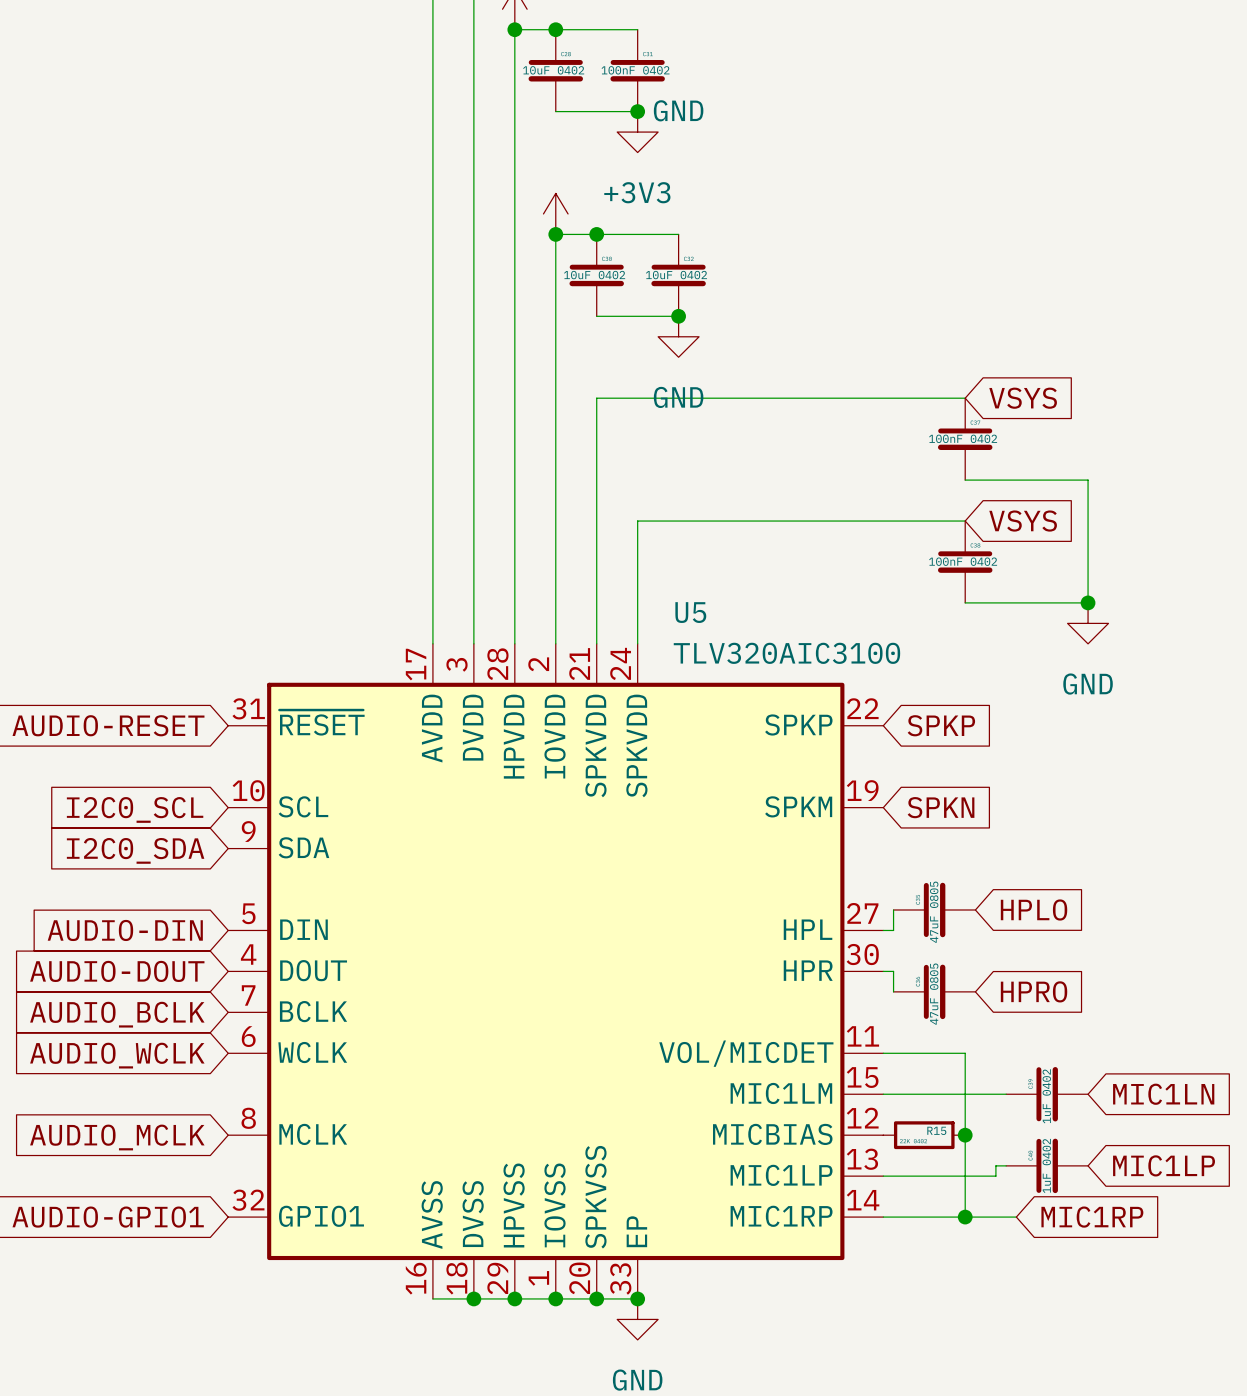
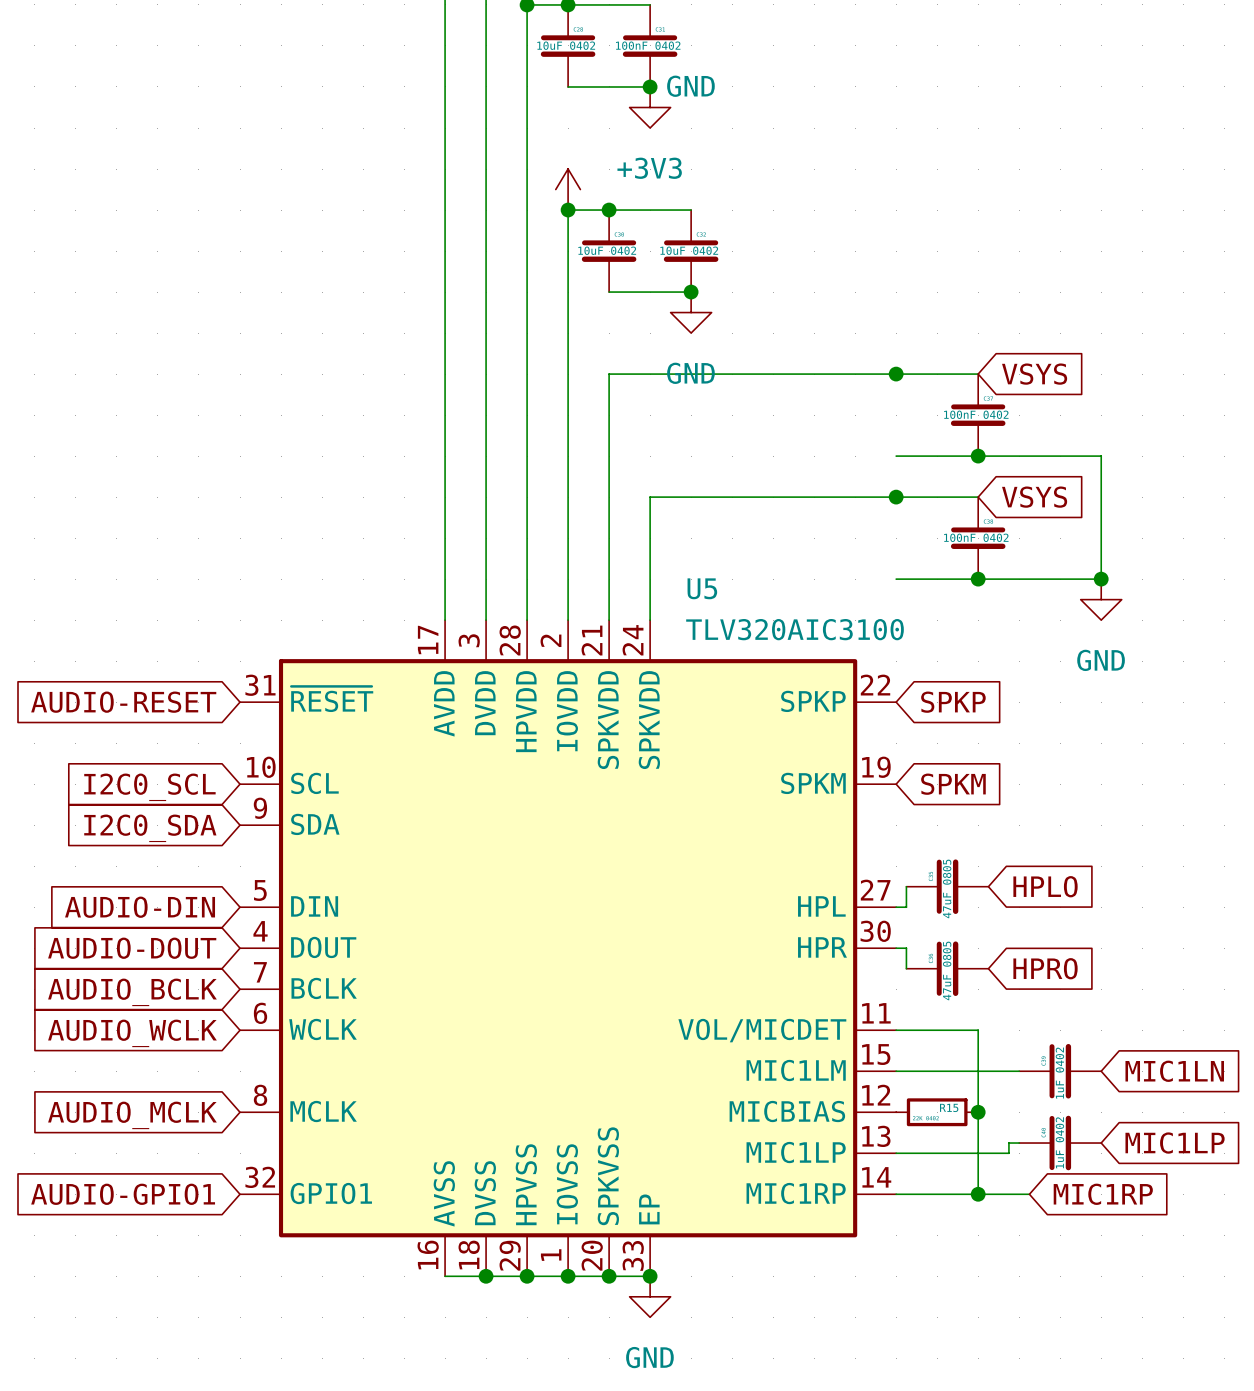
junction: none -> (896, 374)
wire: none -> (896, 456) (978, 456)
junction: none -> (978, 456)
junction: none -> (896, 497)
wire: none -> (896, 579) (978, 579)
junction: none -> (978, 579)
global label: SPKN (941, 807) -> SPKM (953, 784)

